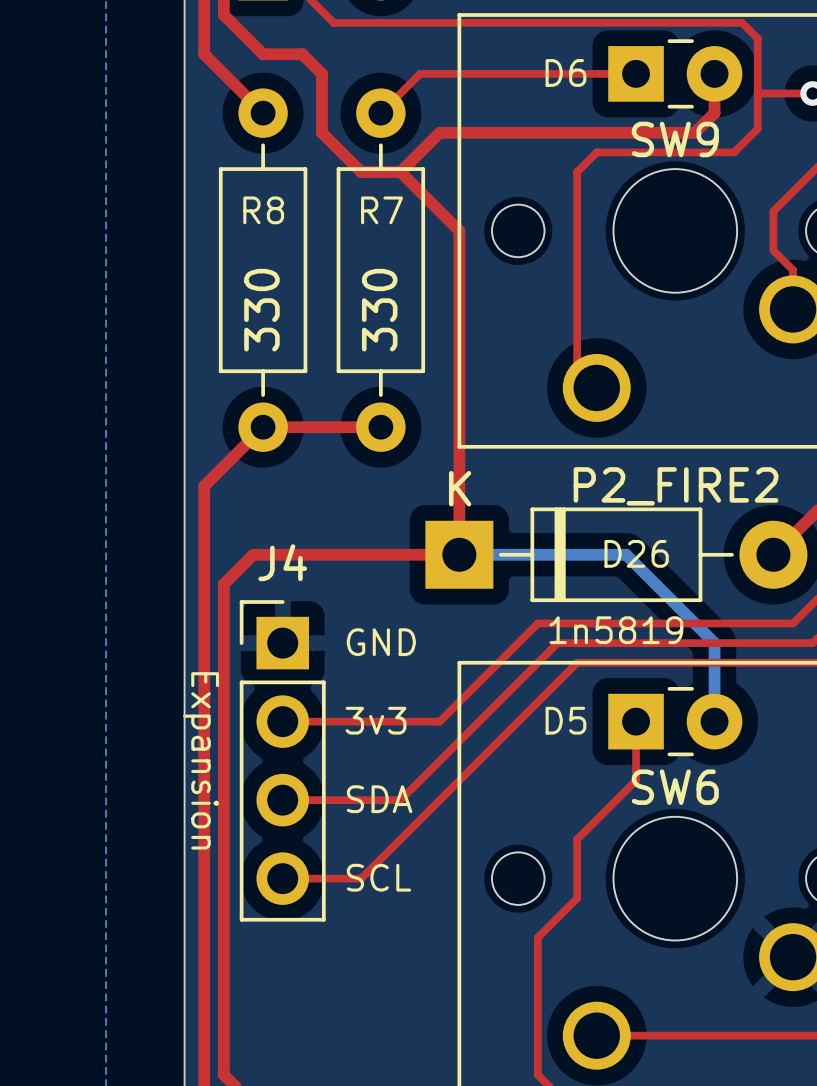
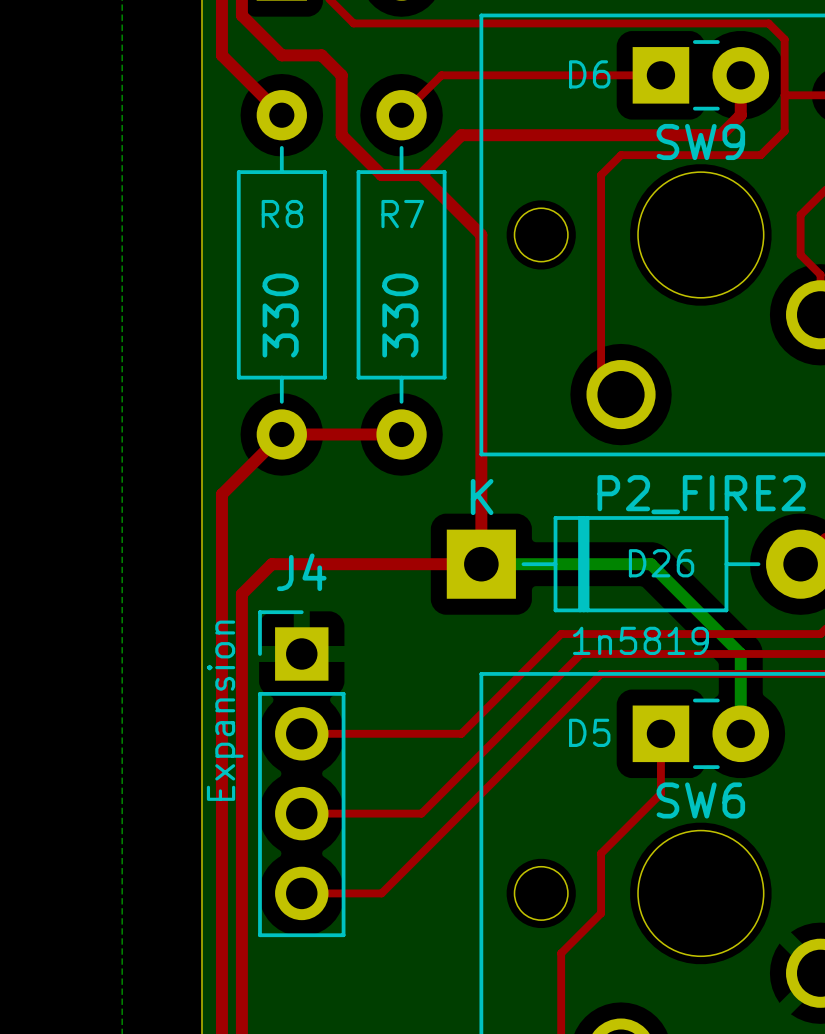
text: GND (381, 642) -> none
text: 3v3 (376, 720) -> none
J4 value rotation: 0° (201, 760) -> 180° (225, 710)
text: SDA (379, 799) -> none
text: SCL (378, 877) -> none

